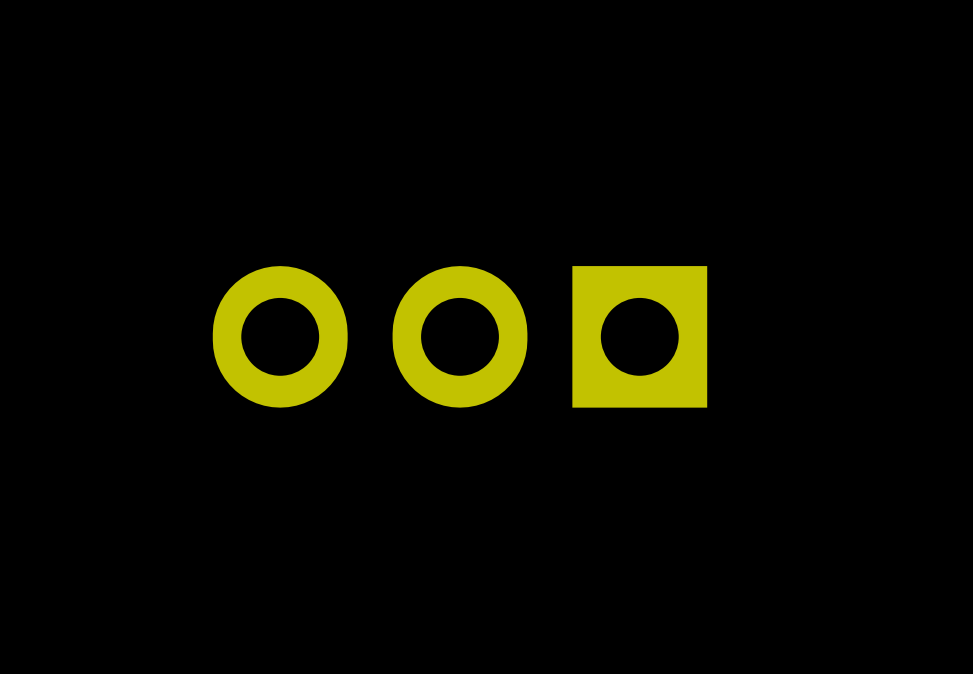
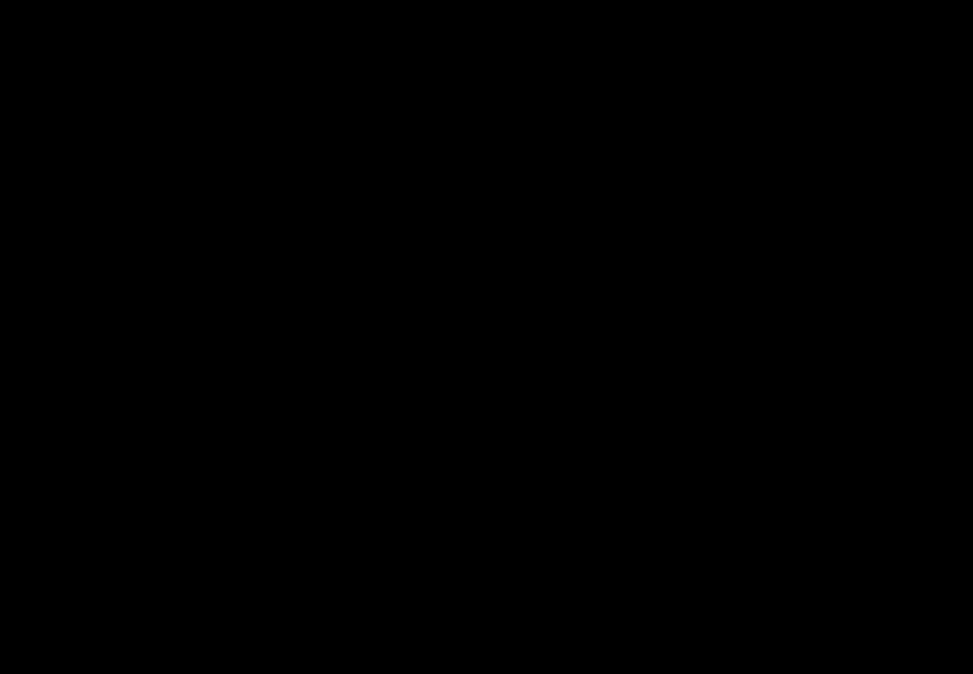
part: (460, 336) -> none

